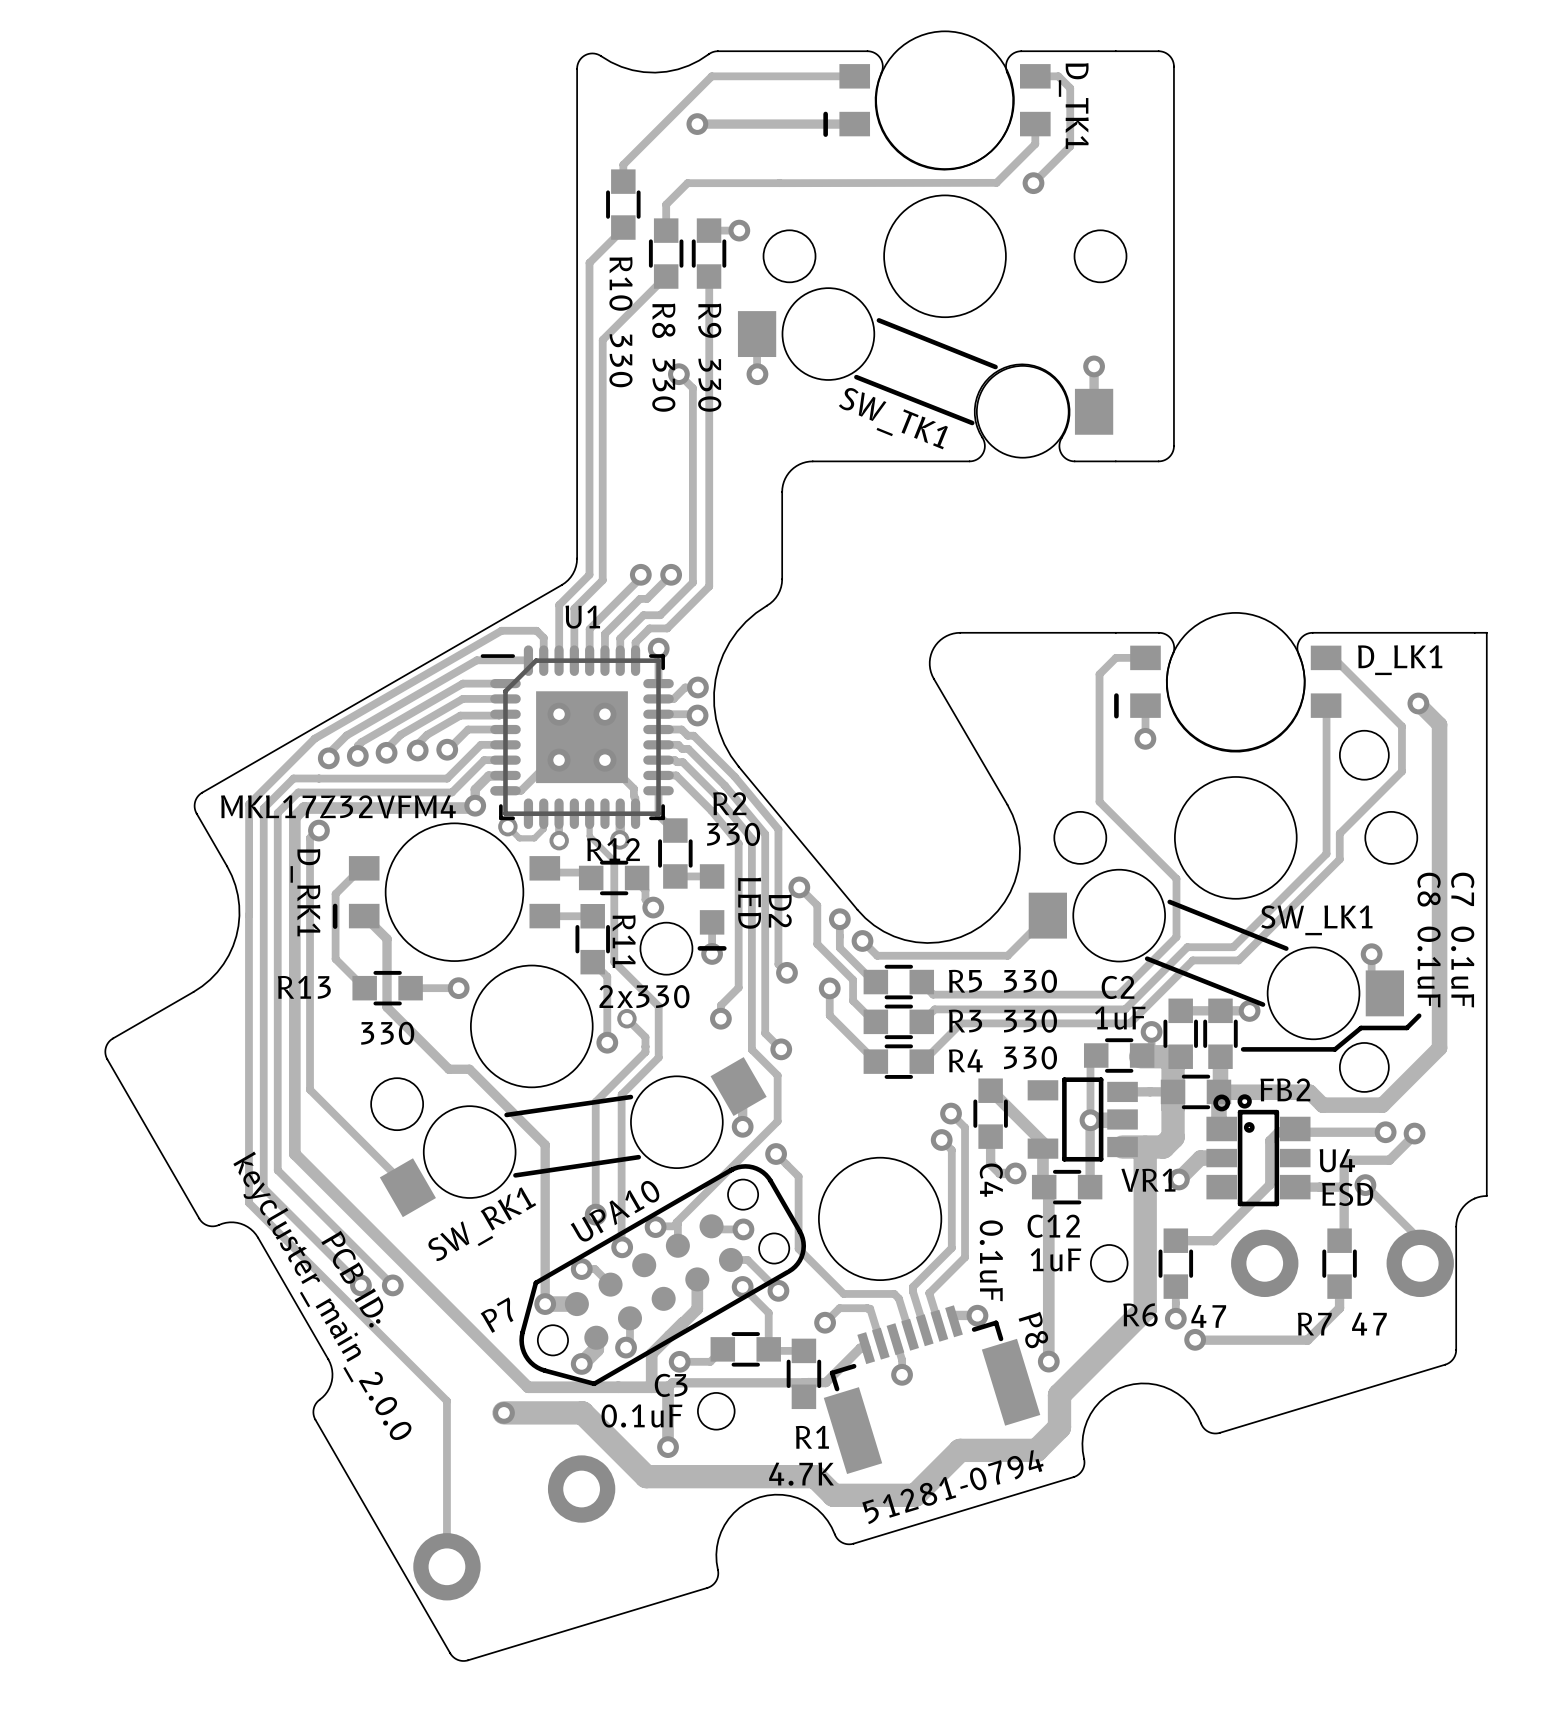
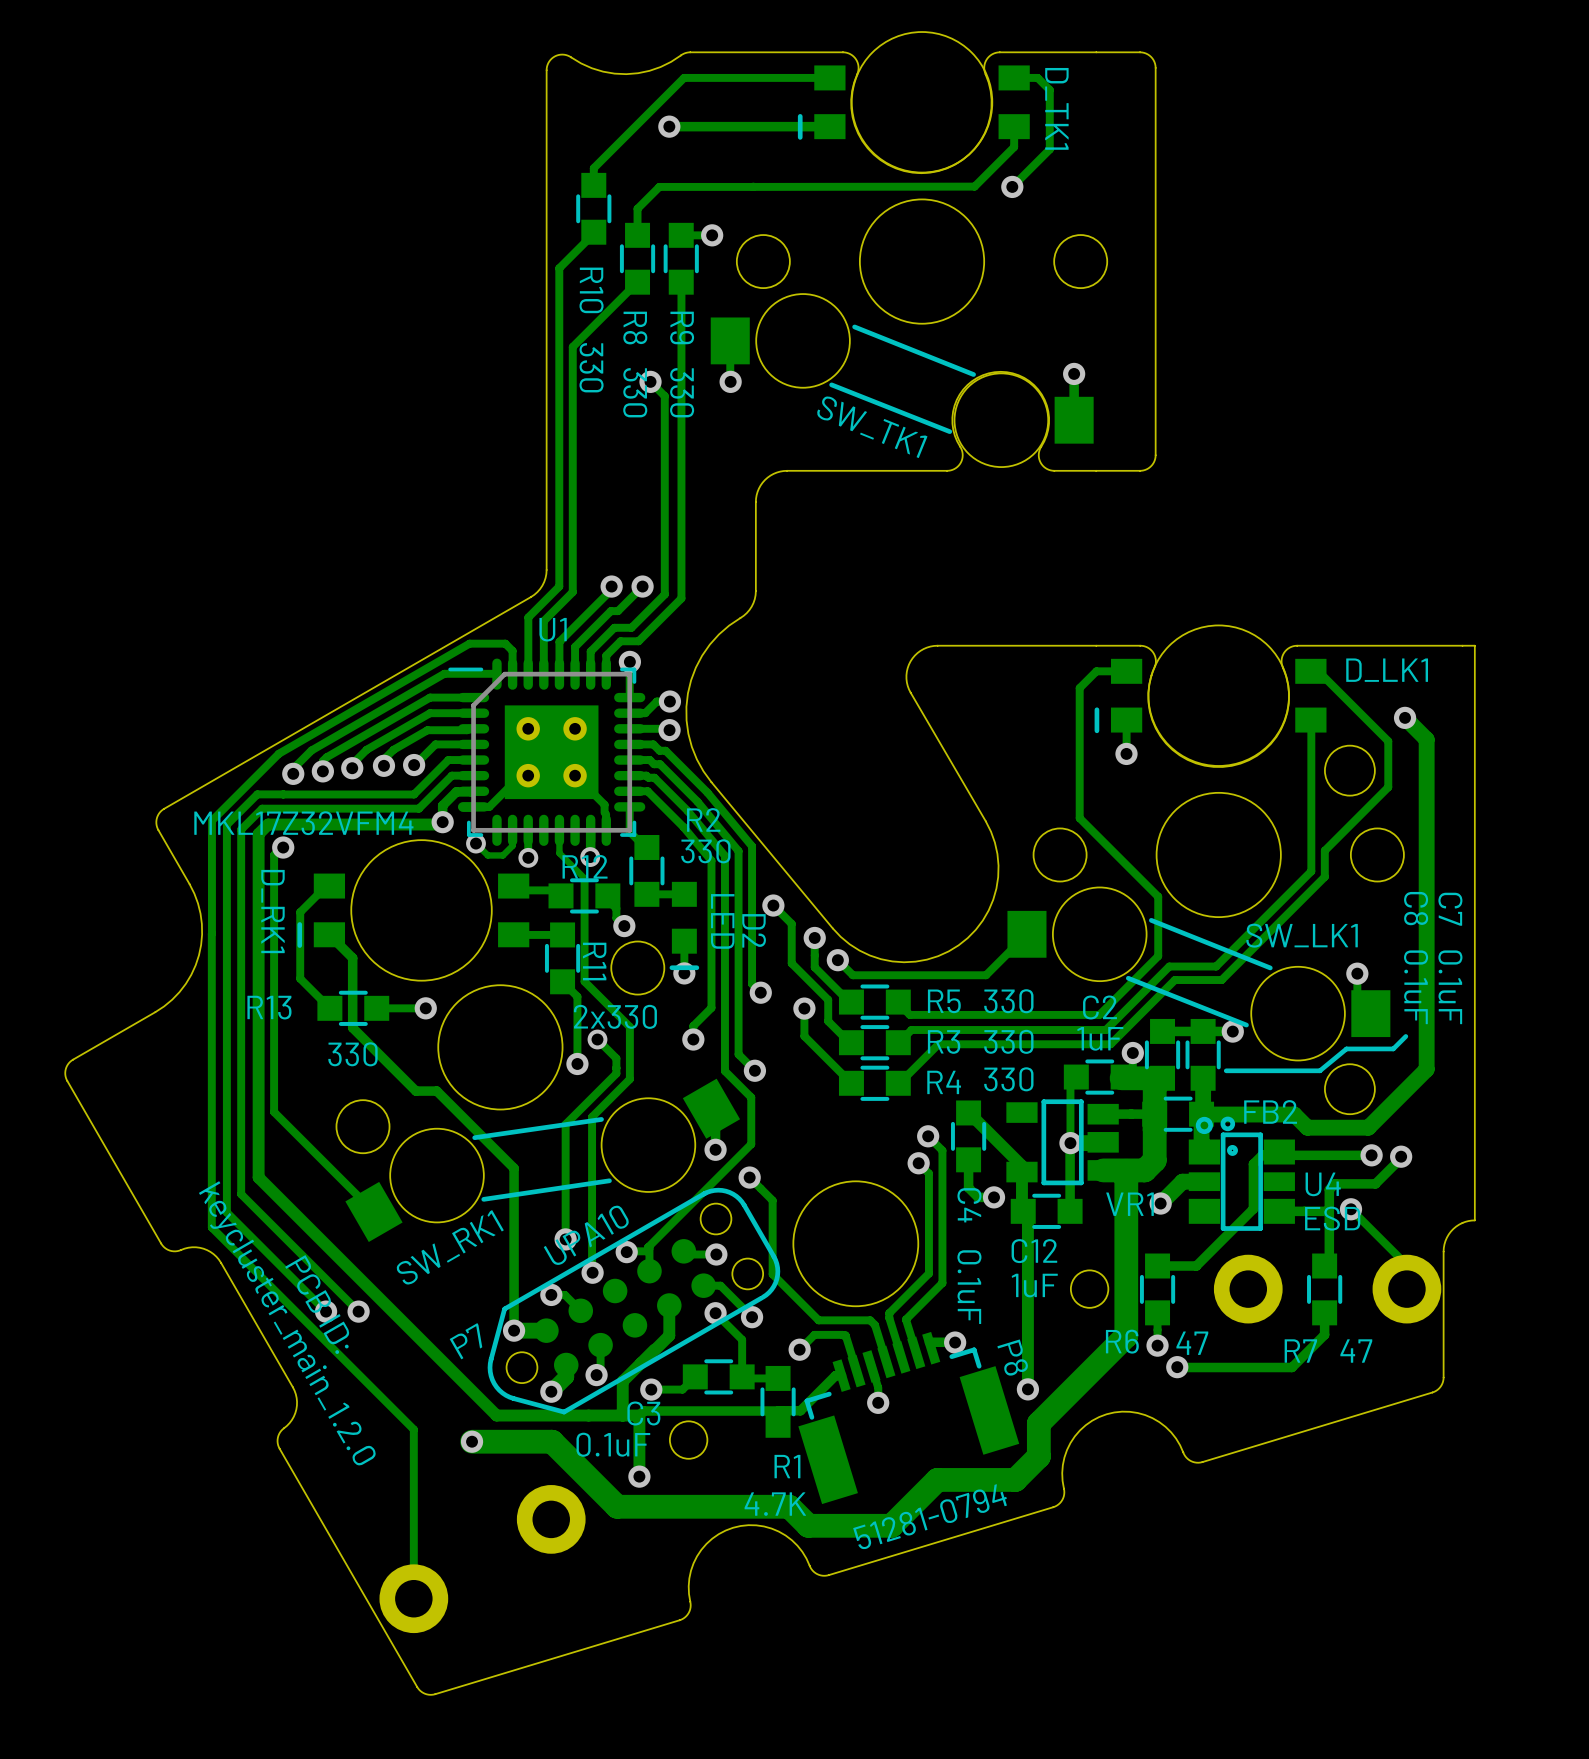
text: keycluster_main_2.0.0 (322, 1295) -> keycluster_main_1.2.0 (287, 1323)

